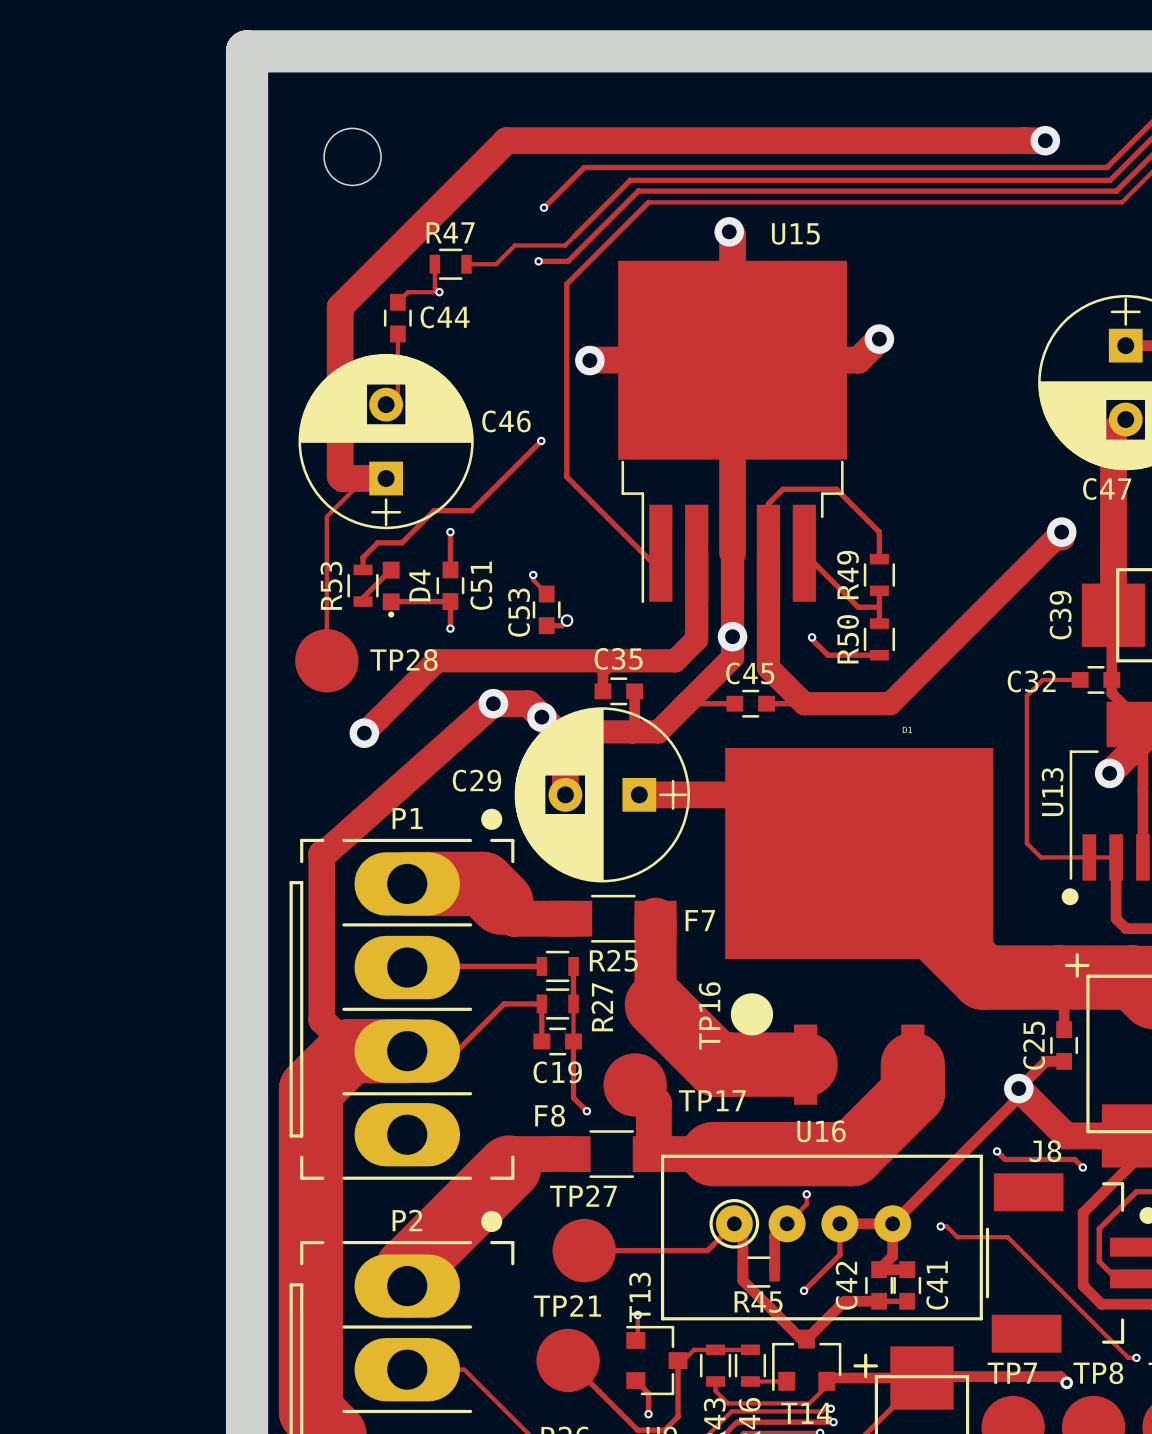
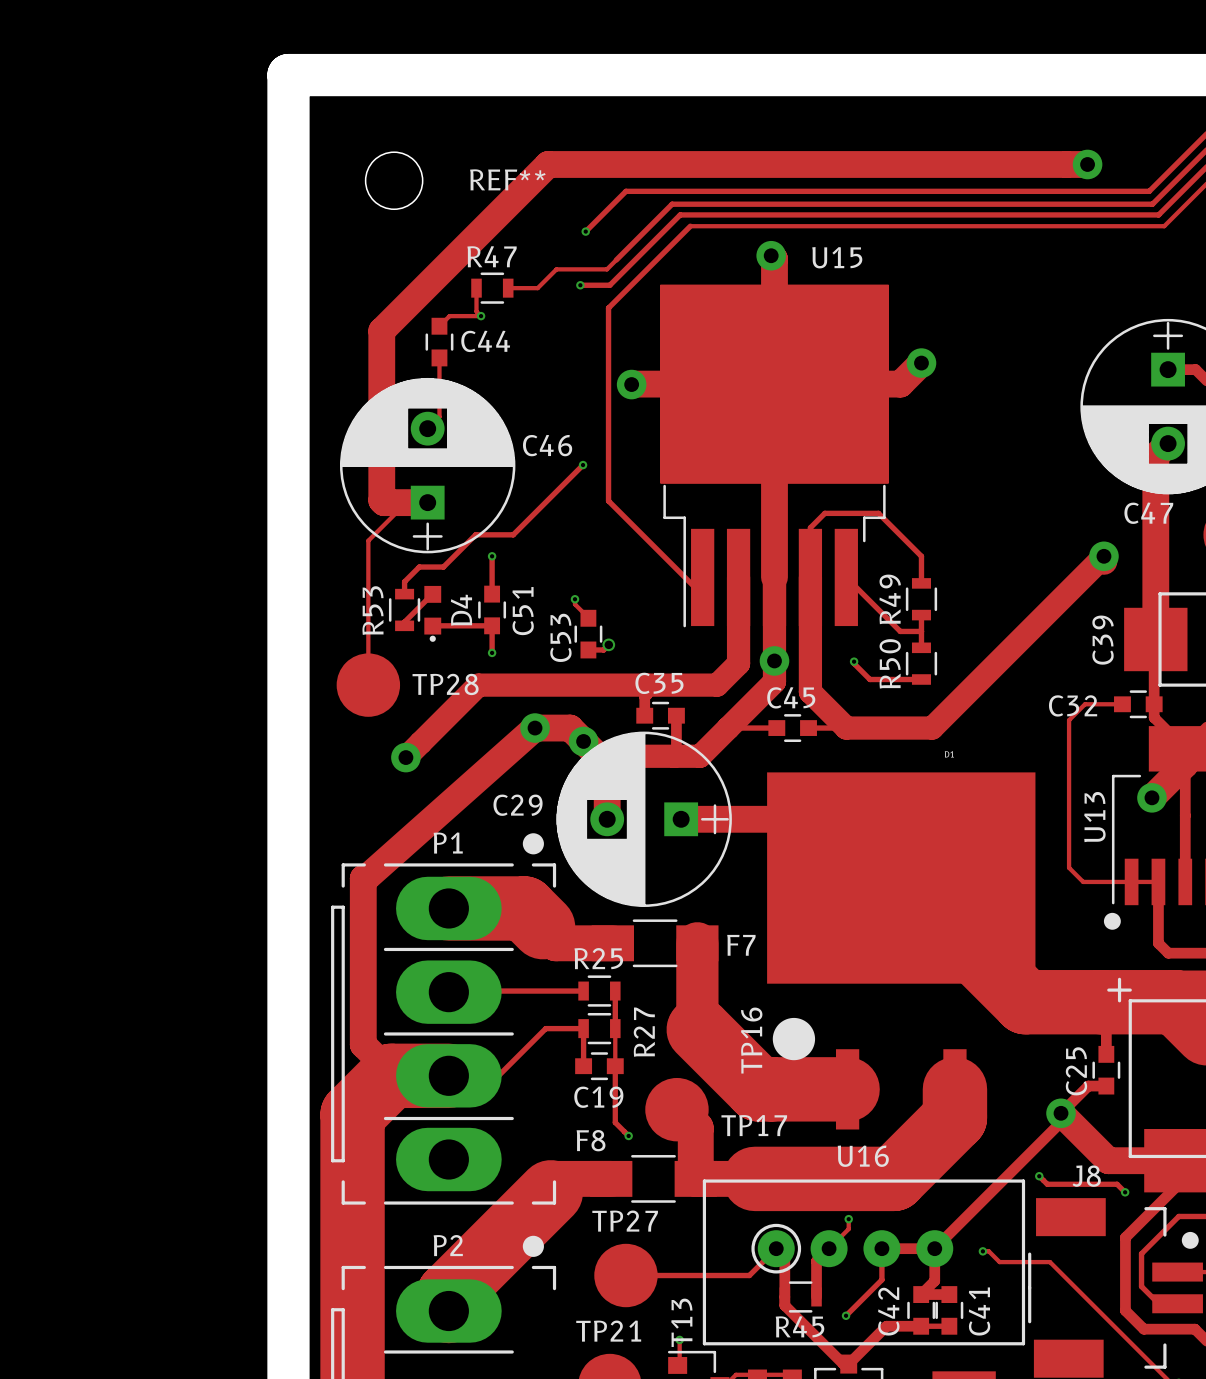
REF** name: none -> REF** (507, 179)
R25 name position: R25 (613, 960) -> R25 (598, 958)

